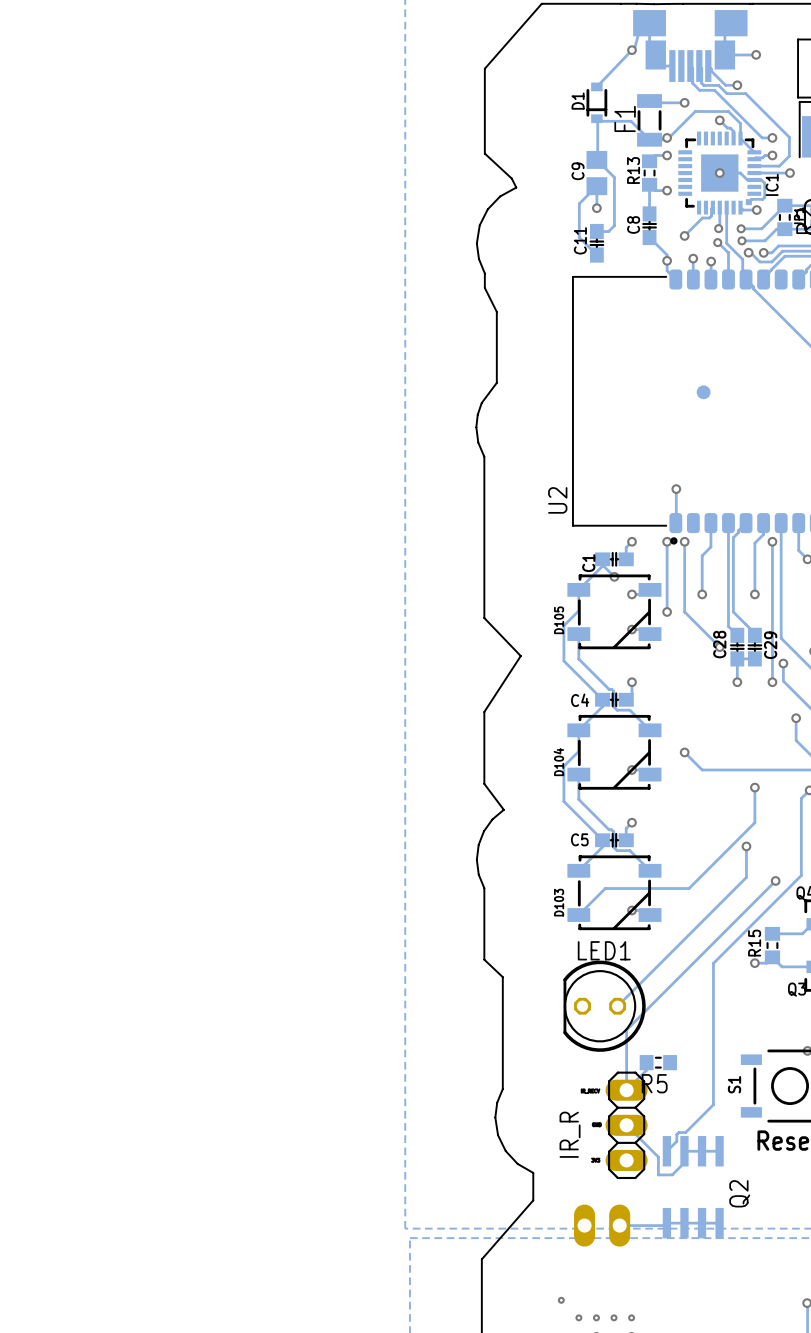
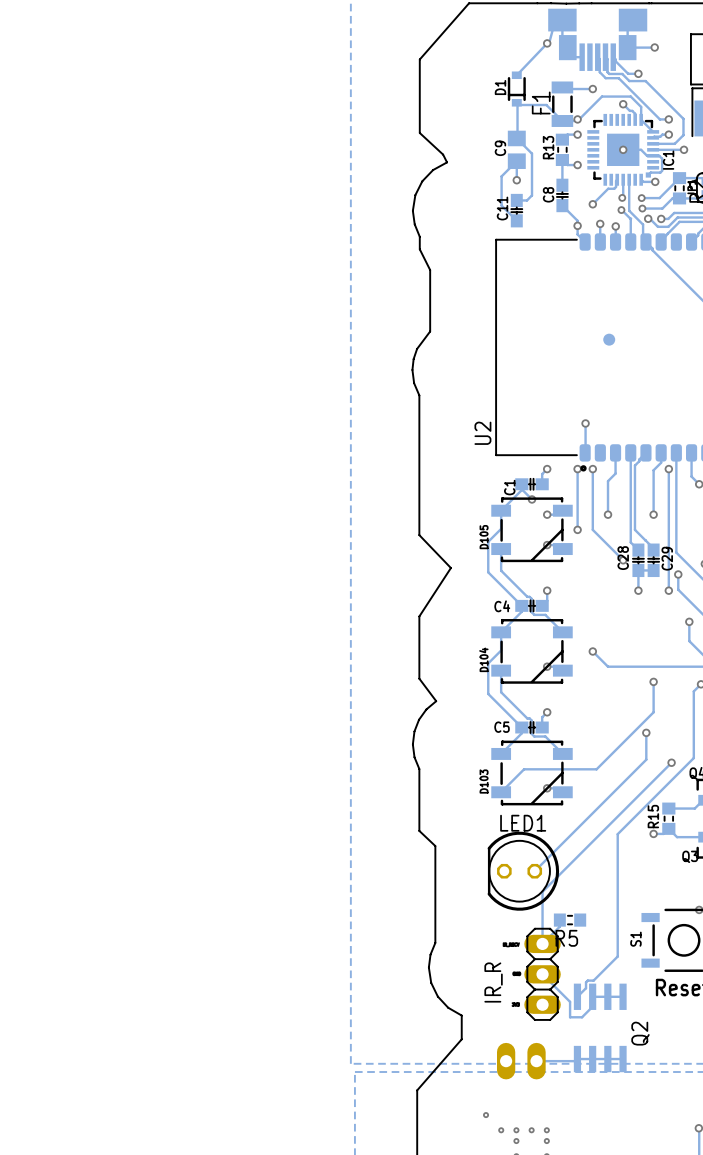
via: none -> (486, 1115)
via: (561, 1300) -> none
via: none -> (501, 1130)
via: none -> (516, 1130)
via: none -> (531, 1130)
via: none -> (546, 1130)
via: (578, 1317) -> none
via: (614, 1317) -> none

